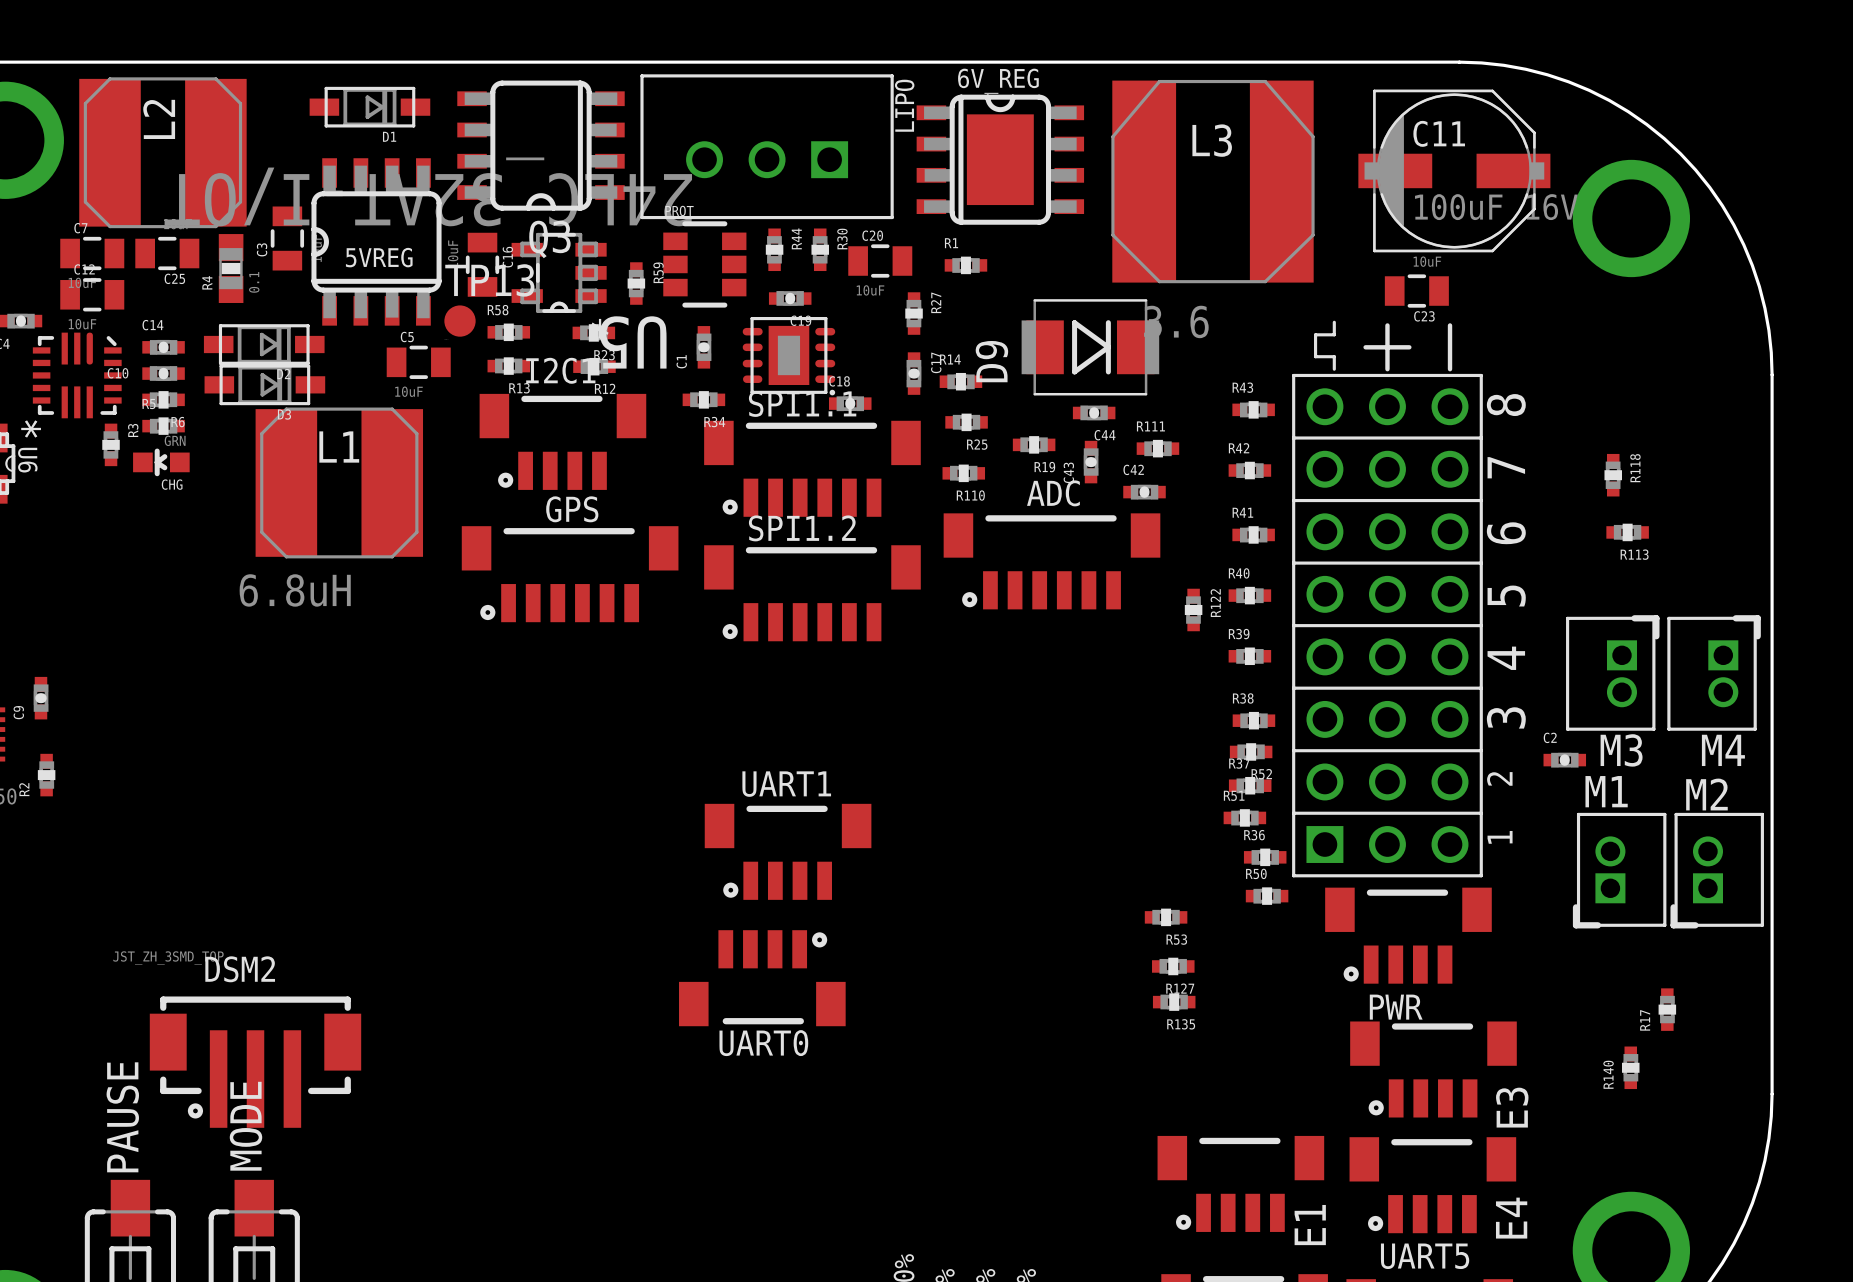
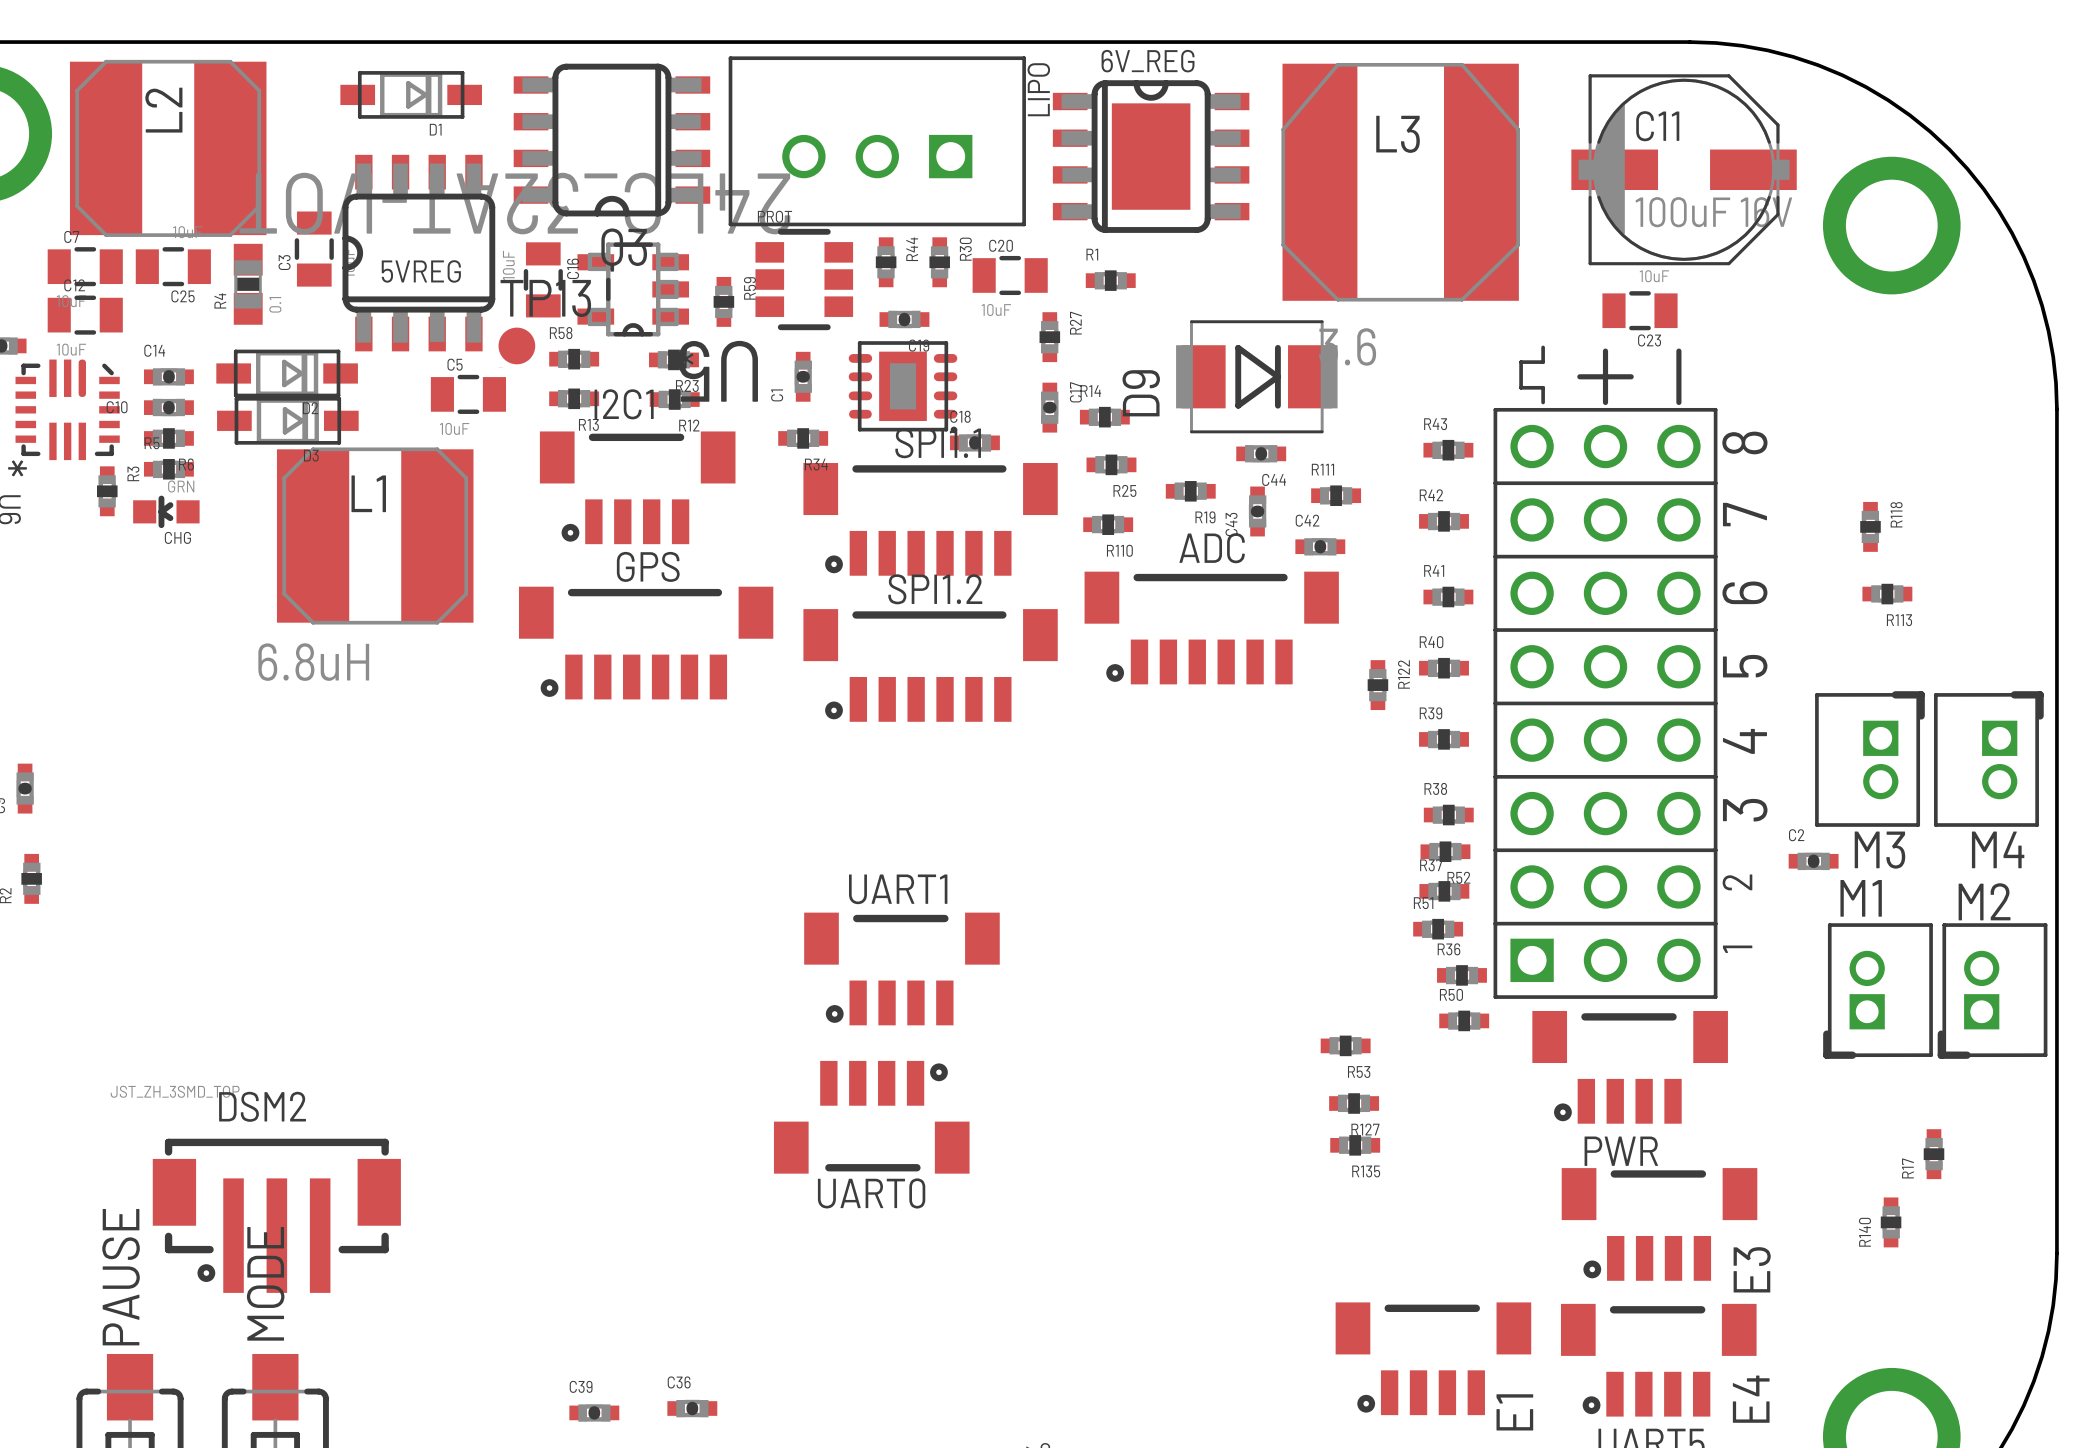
C36: none -> (692, 1408)
C39: none -> (594, 1412)

